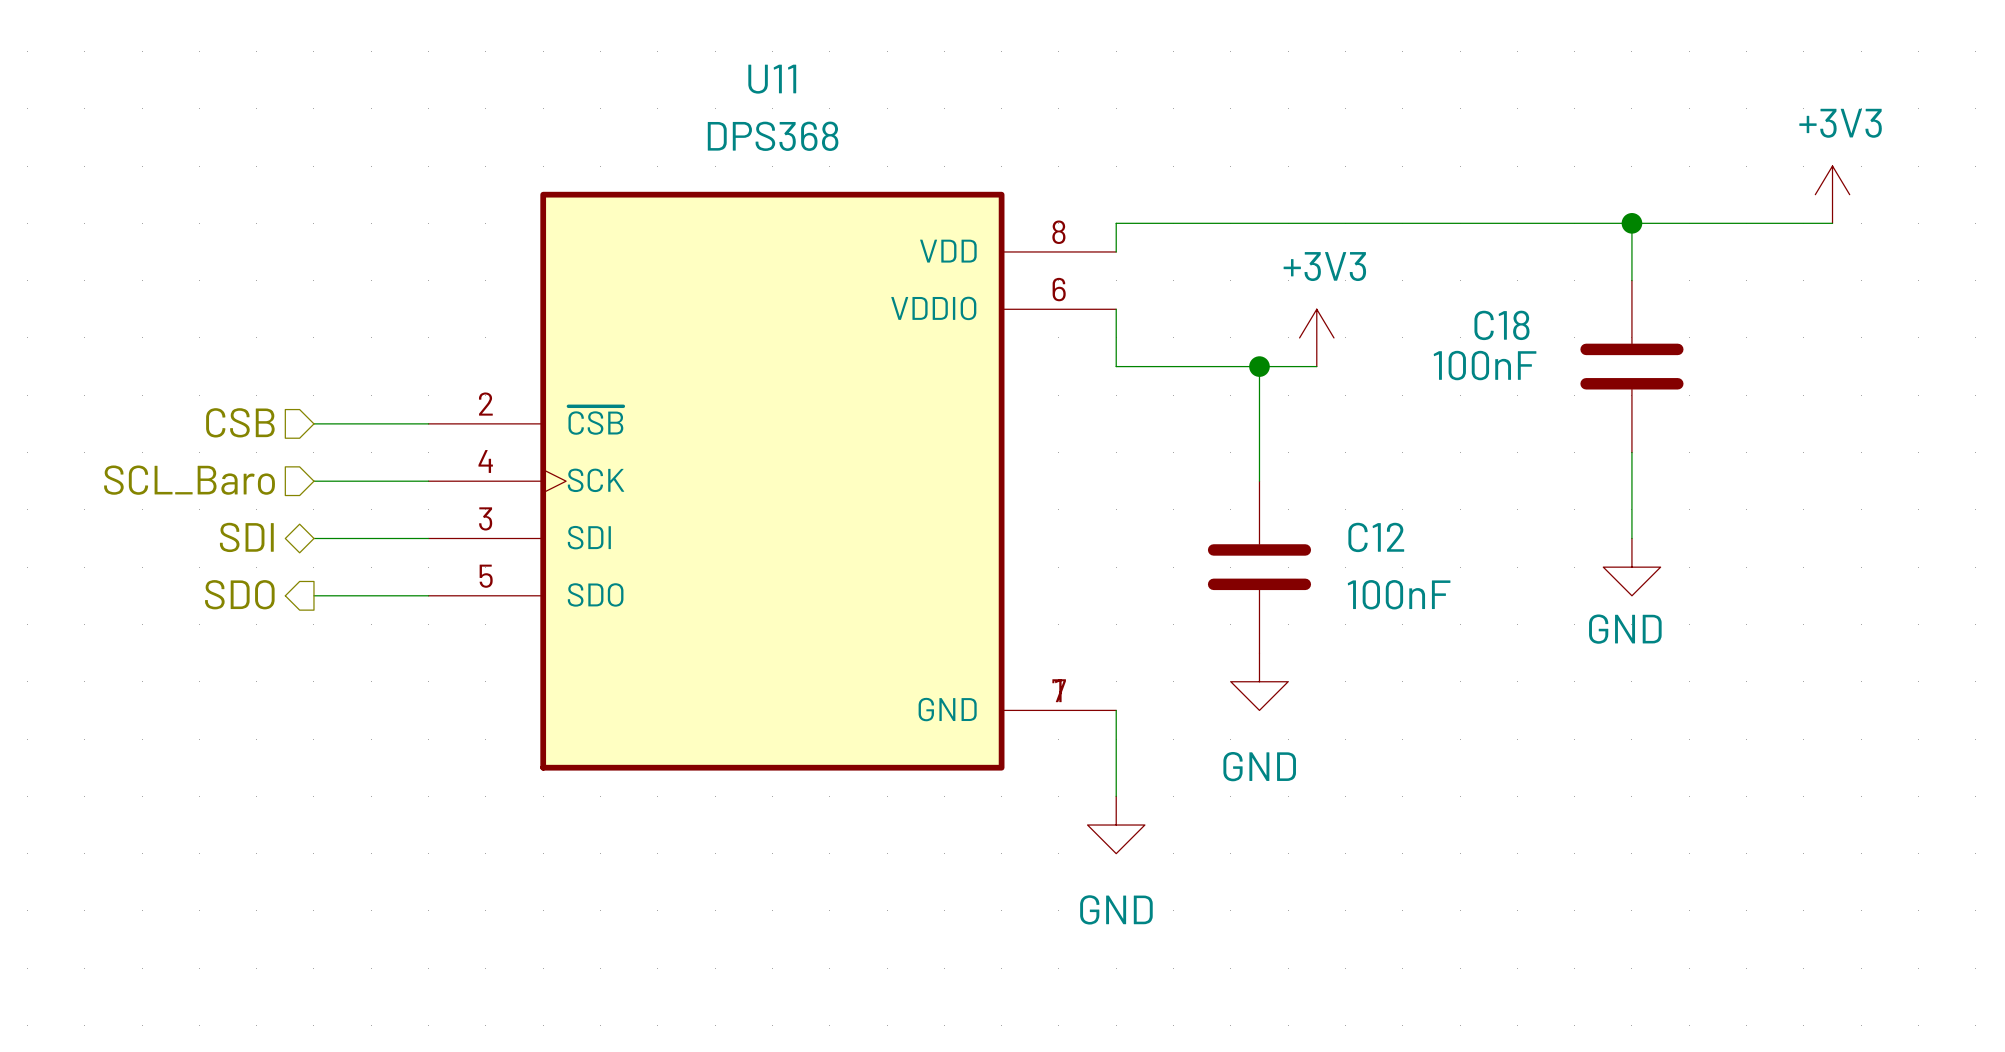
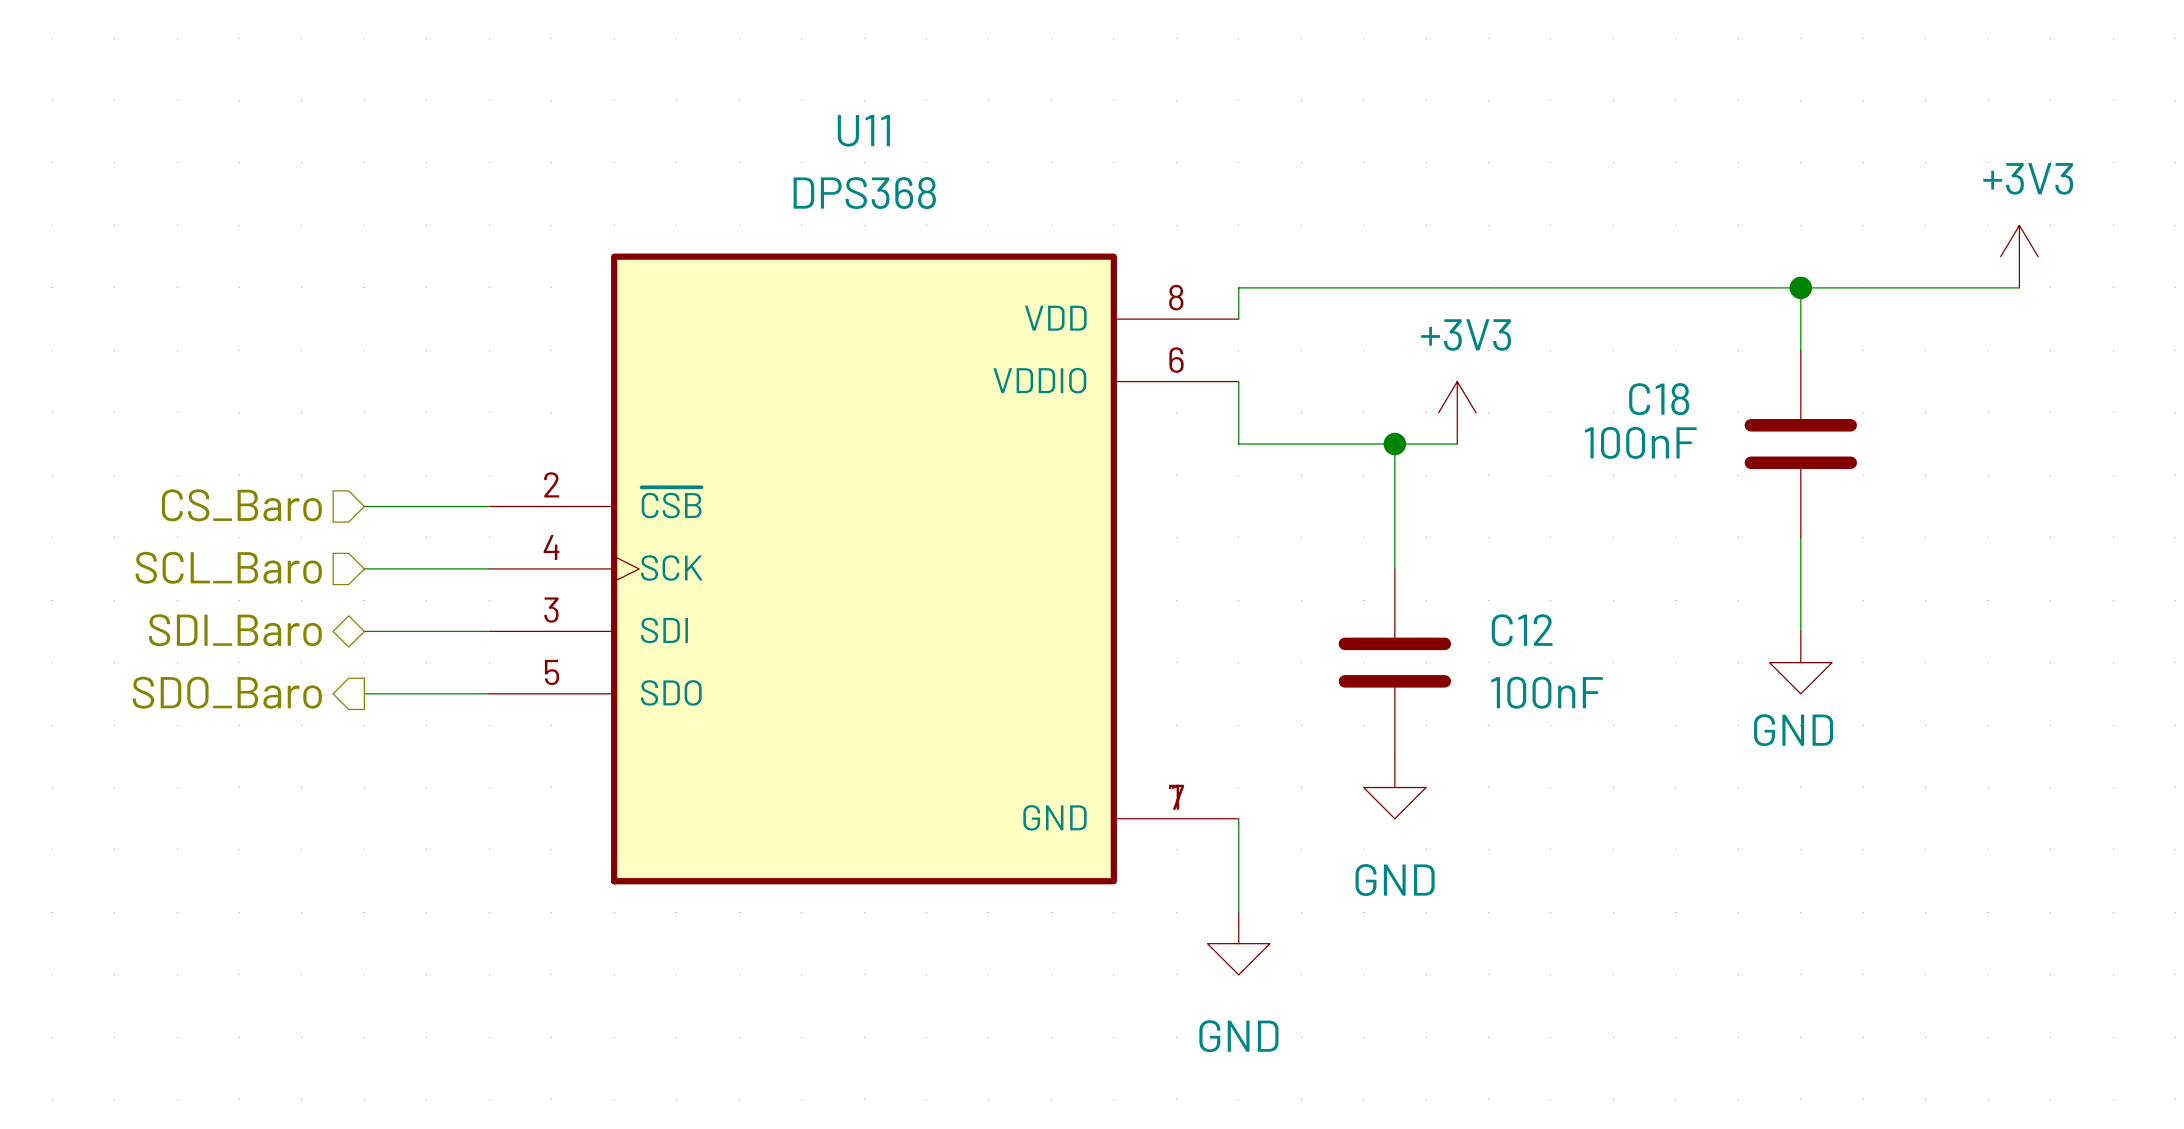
hierarchical label: CSB (240, 422) -> CS_Baro (241, 505)
hierarchical label: SDI (246, 537) -> SDI_Baro (235, 630)
hierarchical label: SDO (239, 594) -> SDO_Baro (227, 692)

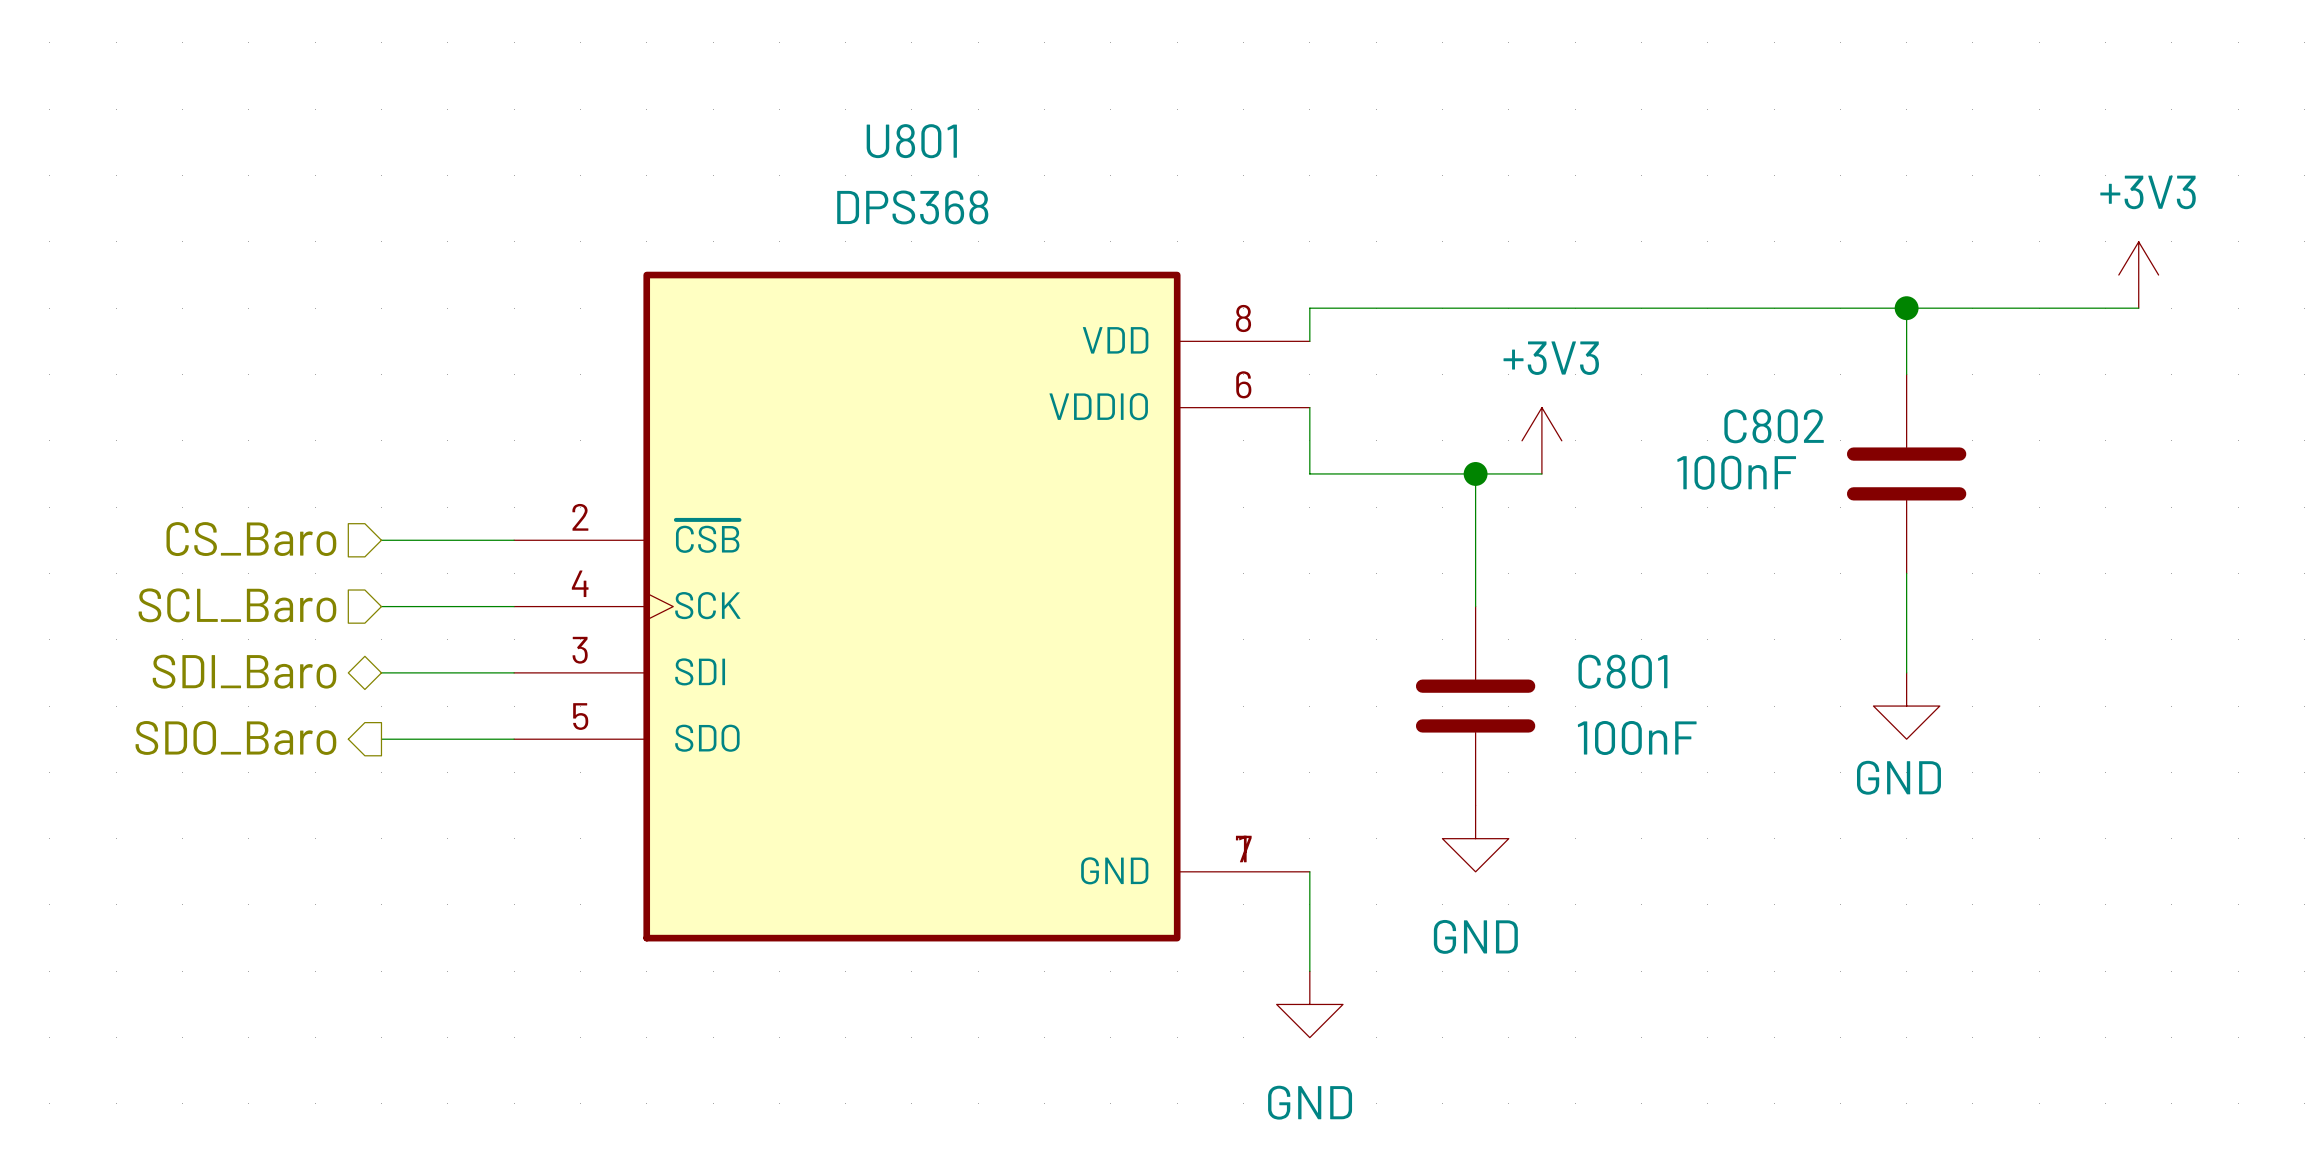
U11 name: U11 (863, 130) -> U801 (911, 141)
C18 name: C18 (1659, 399) -> C802 (1774, 426)
C12 name: C12 (1522, 630) -> C801 (1622, 671)

